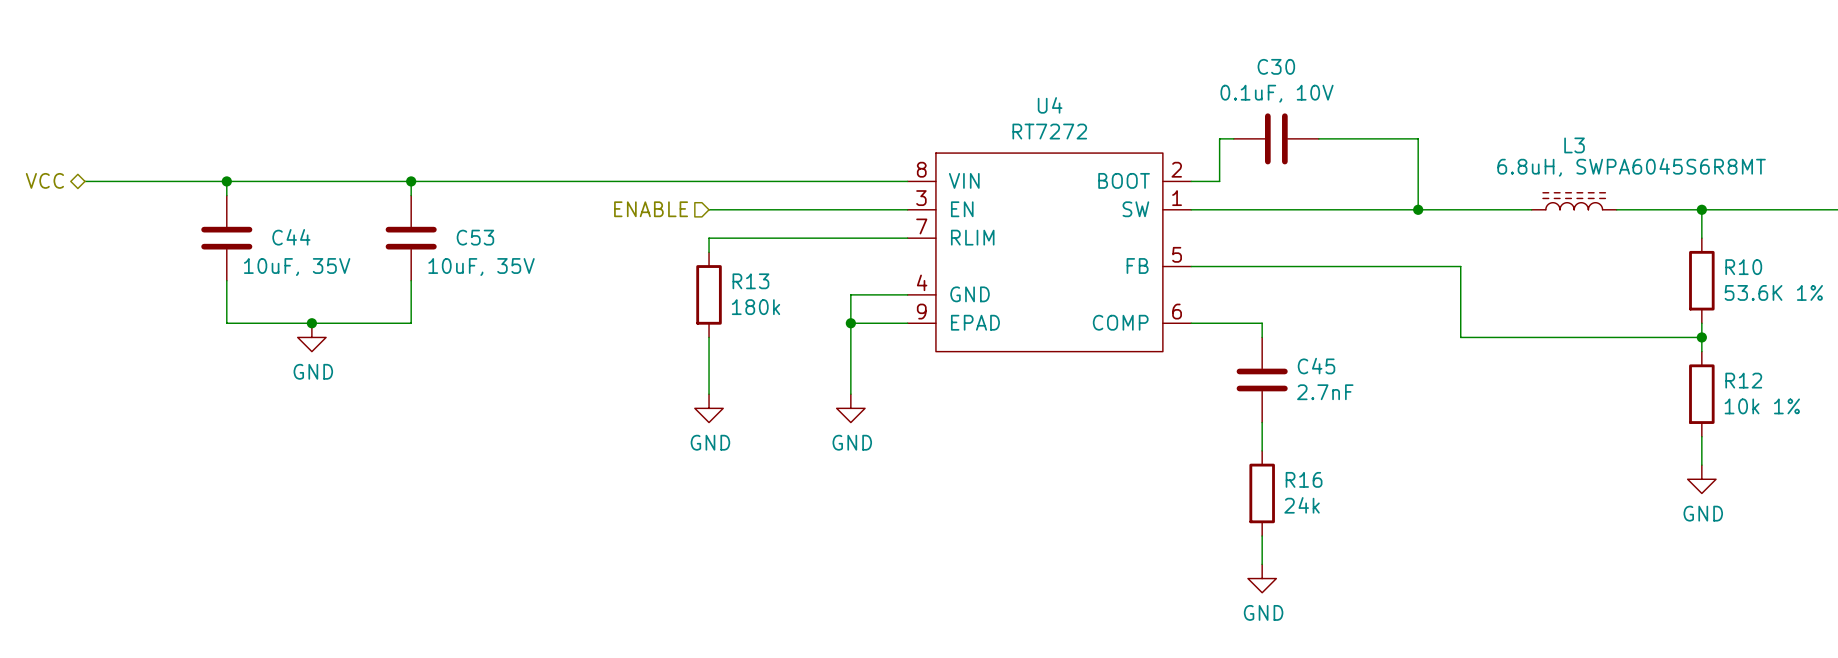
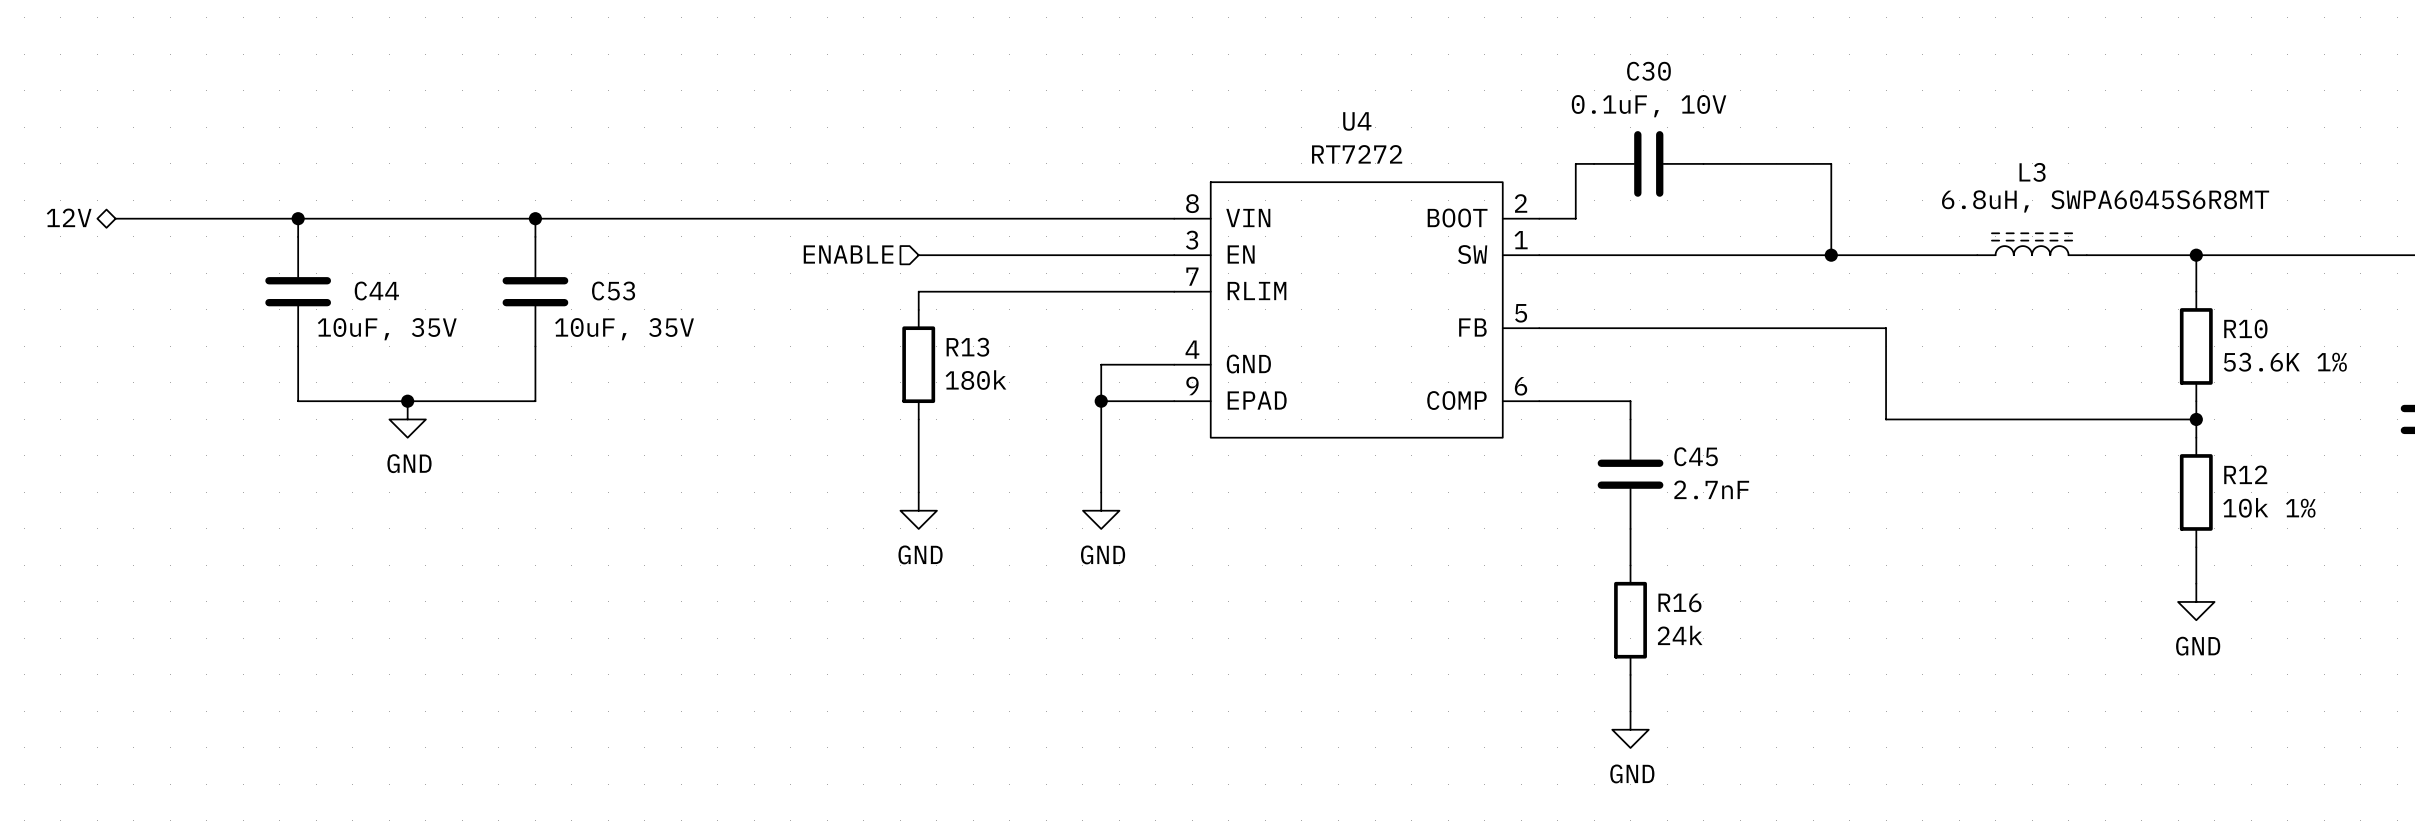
hierarchical label: VCC (44, 180) -> 12V (69, 217)

